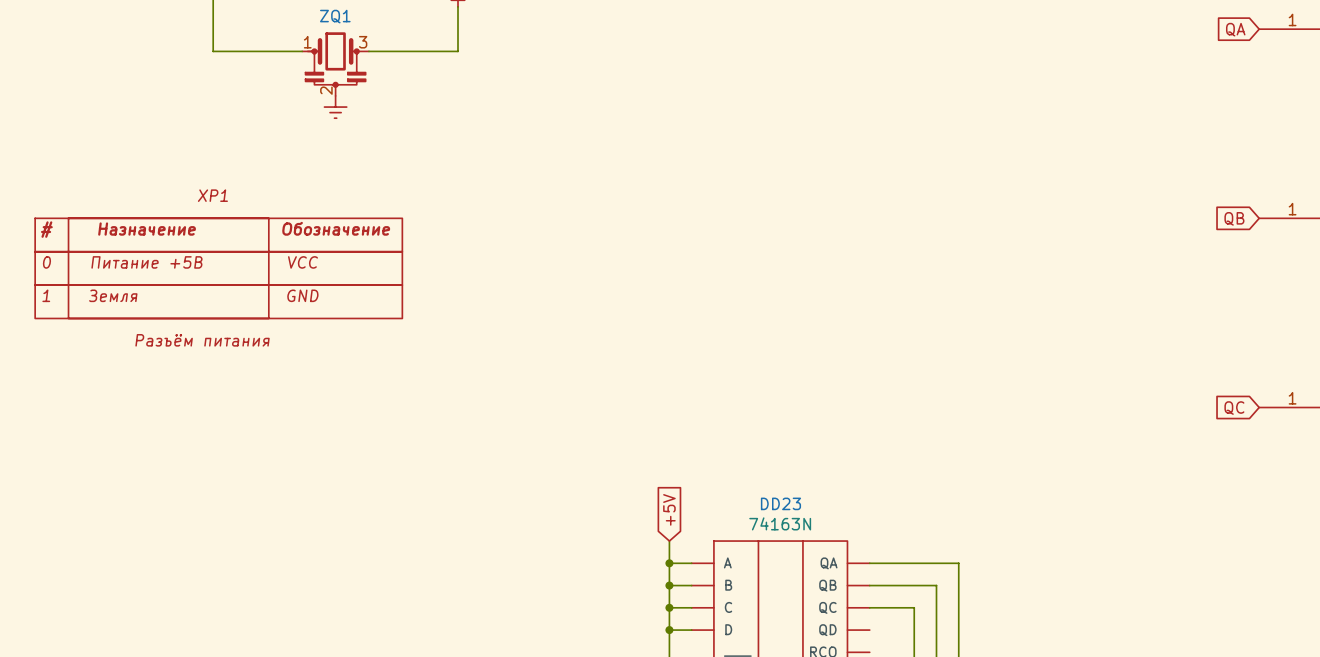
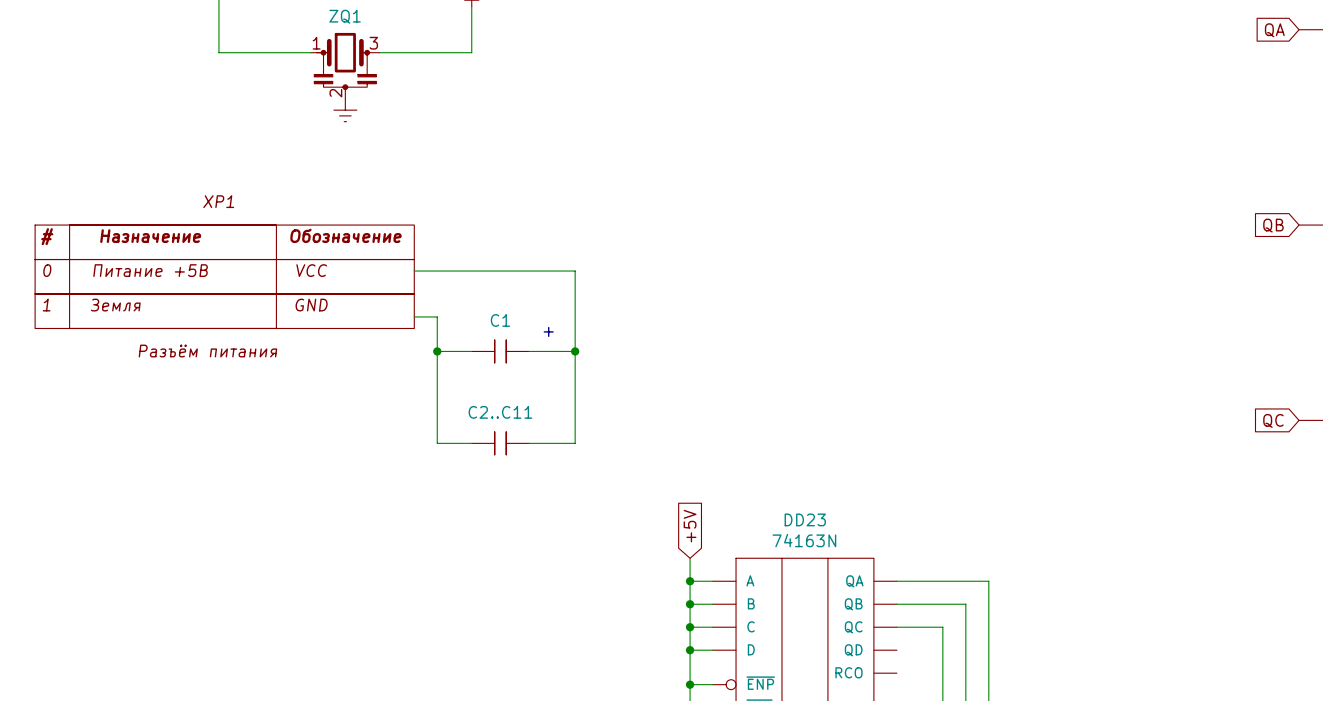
wire: none -> (414, 271) (575, 271) (575, 443) (529, 443)
wire: none -> (414, 316) (437, 316) (437, 443) (471, 443)
text: none -> + (548, 331)
wire: none -> (437, 351) (471, 351)
junction: none -> (437, 351)
C1: none -> (500, 351)
wire: none -> (529, 351) (575, 351)
junction: none -> (575, 351)
C2..C11: none -> (500, 443)

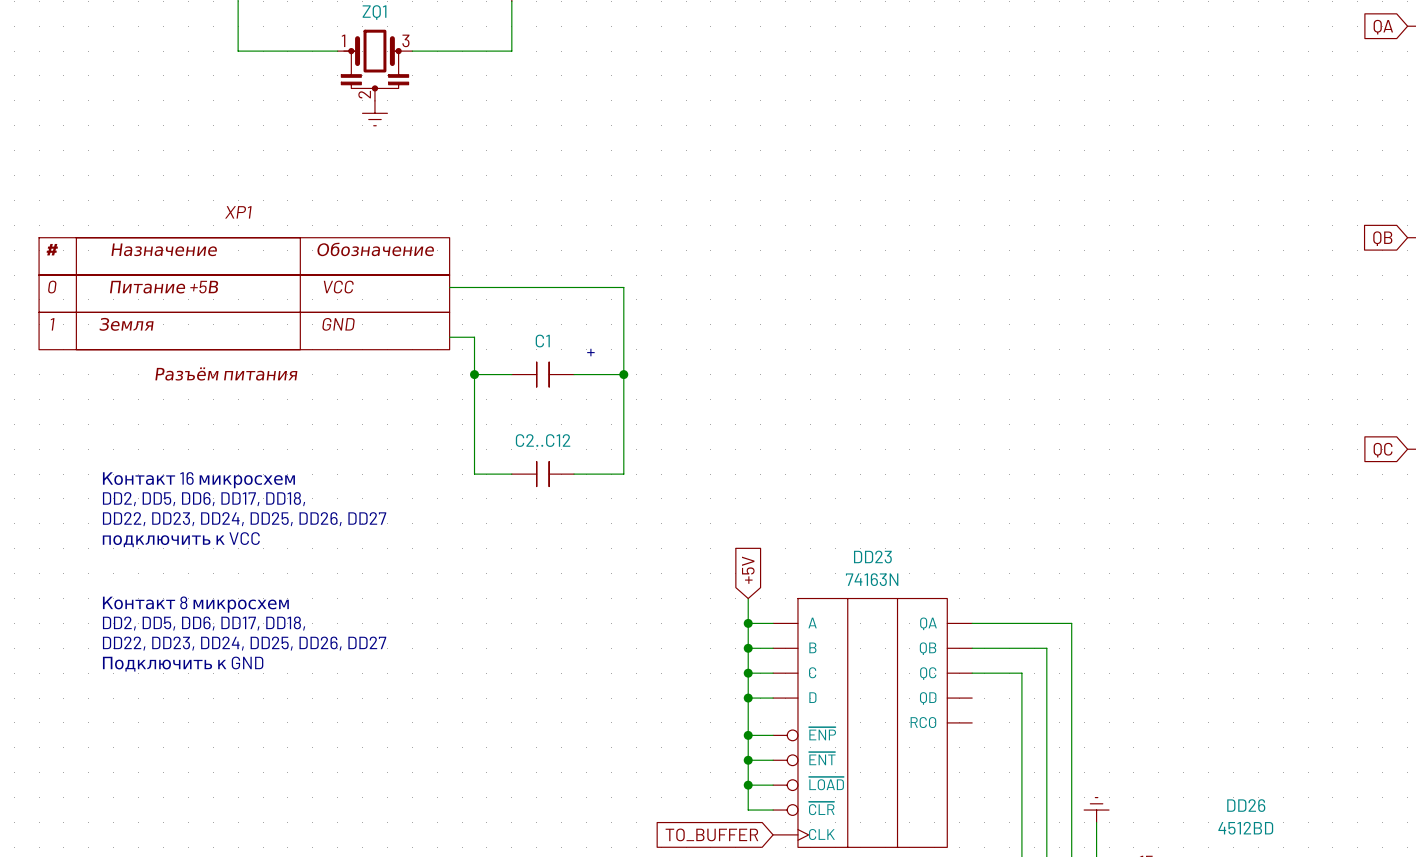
C2..C11 name: C2..C11 (500, 412) -> C2..C12 (543, 440)
text: none -> Контакт 16 микросхем (198, 480)
text: none -> DD2, DD5, DD6, DD17, DD18, (204, 499)
text: none -> DD22, DD23, DD24, DD25, DD26, DD27 (244, 519)
text: none -> подключить к VCC (181, 539)
text: none -> Контакт 8 микросхем (195, 604)
text: none -> DD2, DD5, DD6, DD17, DD18, (204, 623)
text: none -> DD22, DD23, DD24, DD25, DD26, DD27 (244, 643)
text: none -> Подключить к GND (183, 664)

